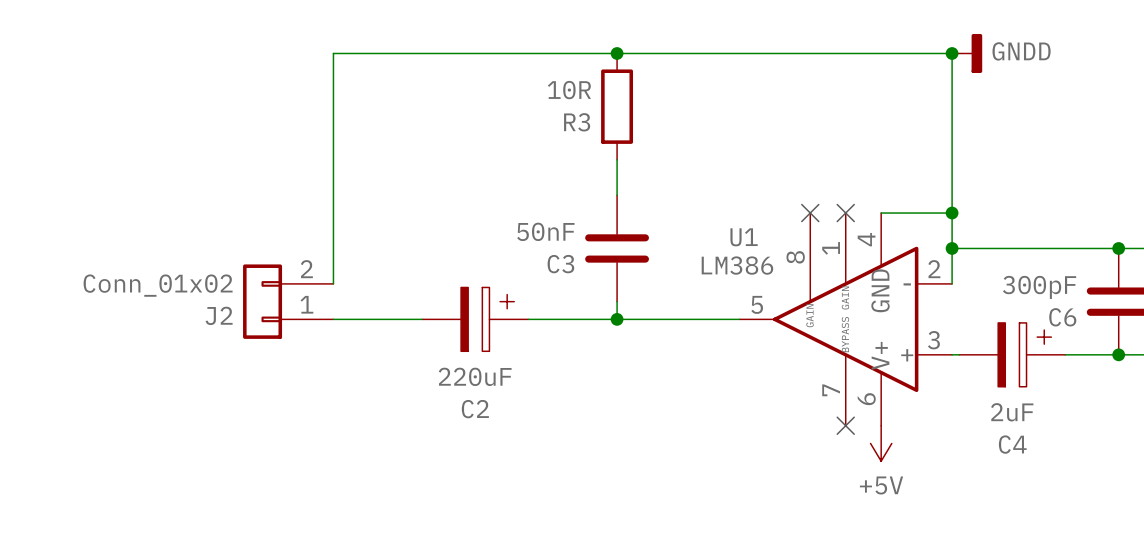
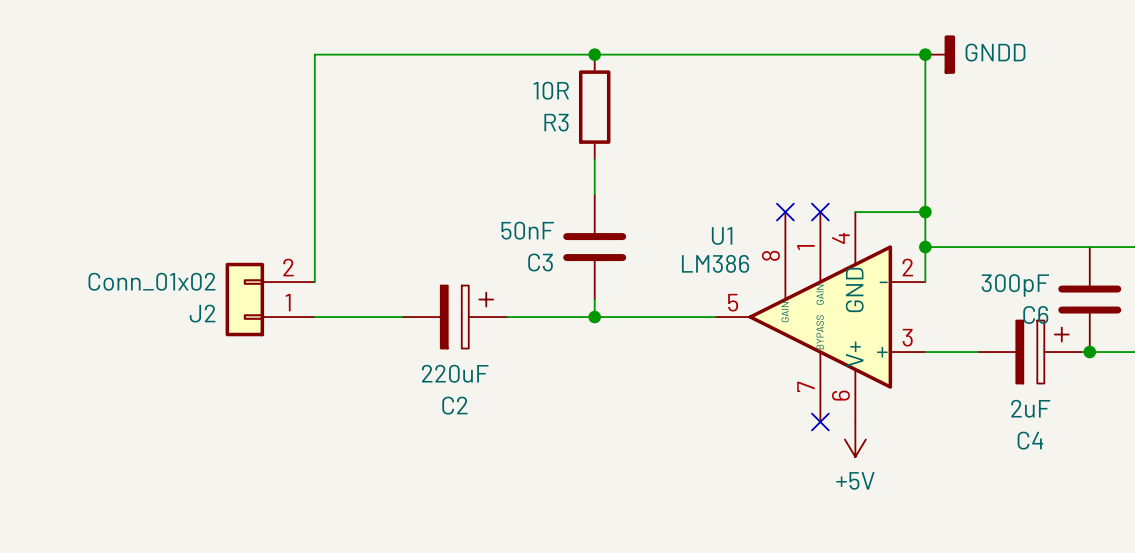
junction: (1118, 248) -> none
C4 position: (1012, 354) -> (1030, 352)

